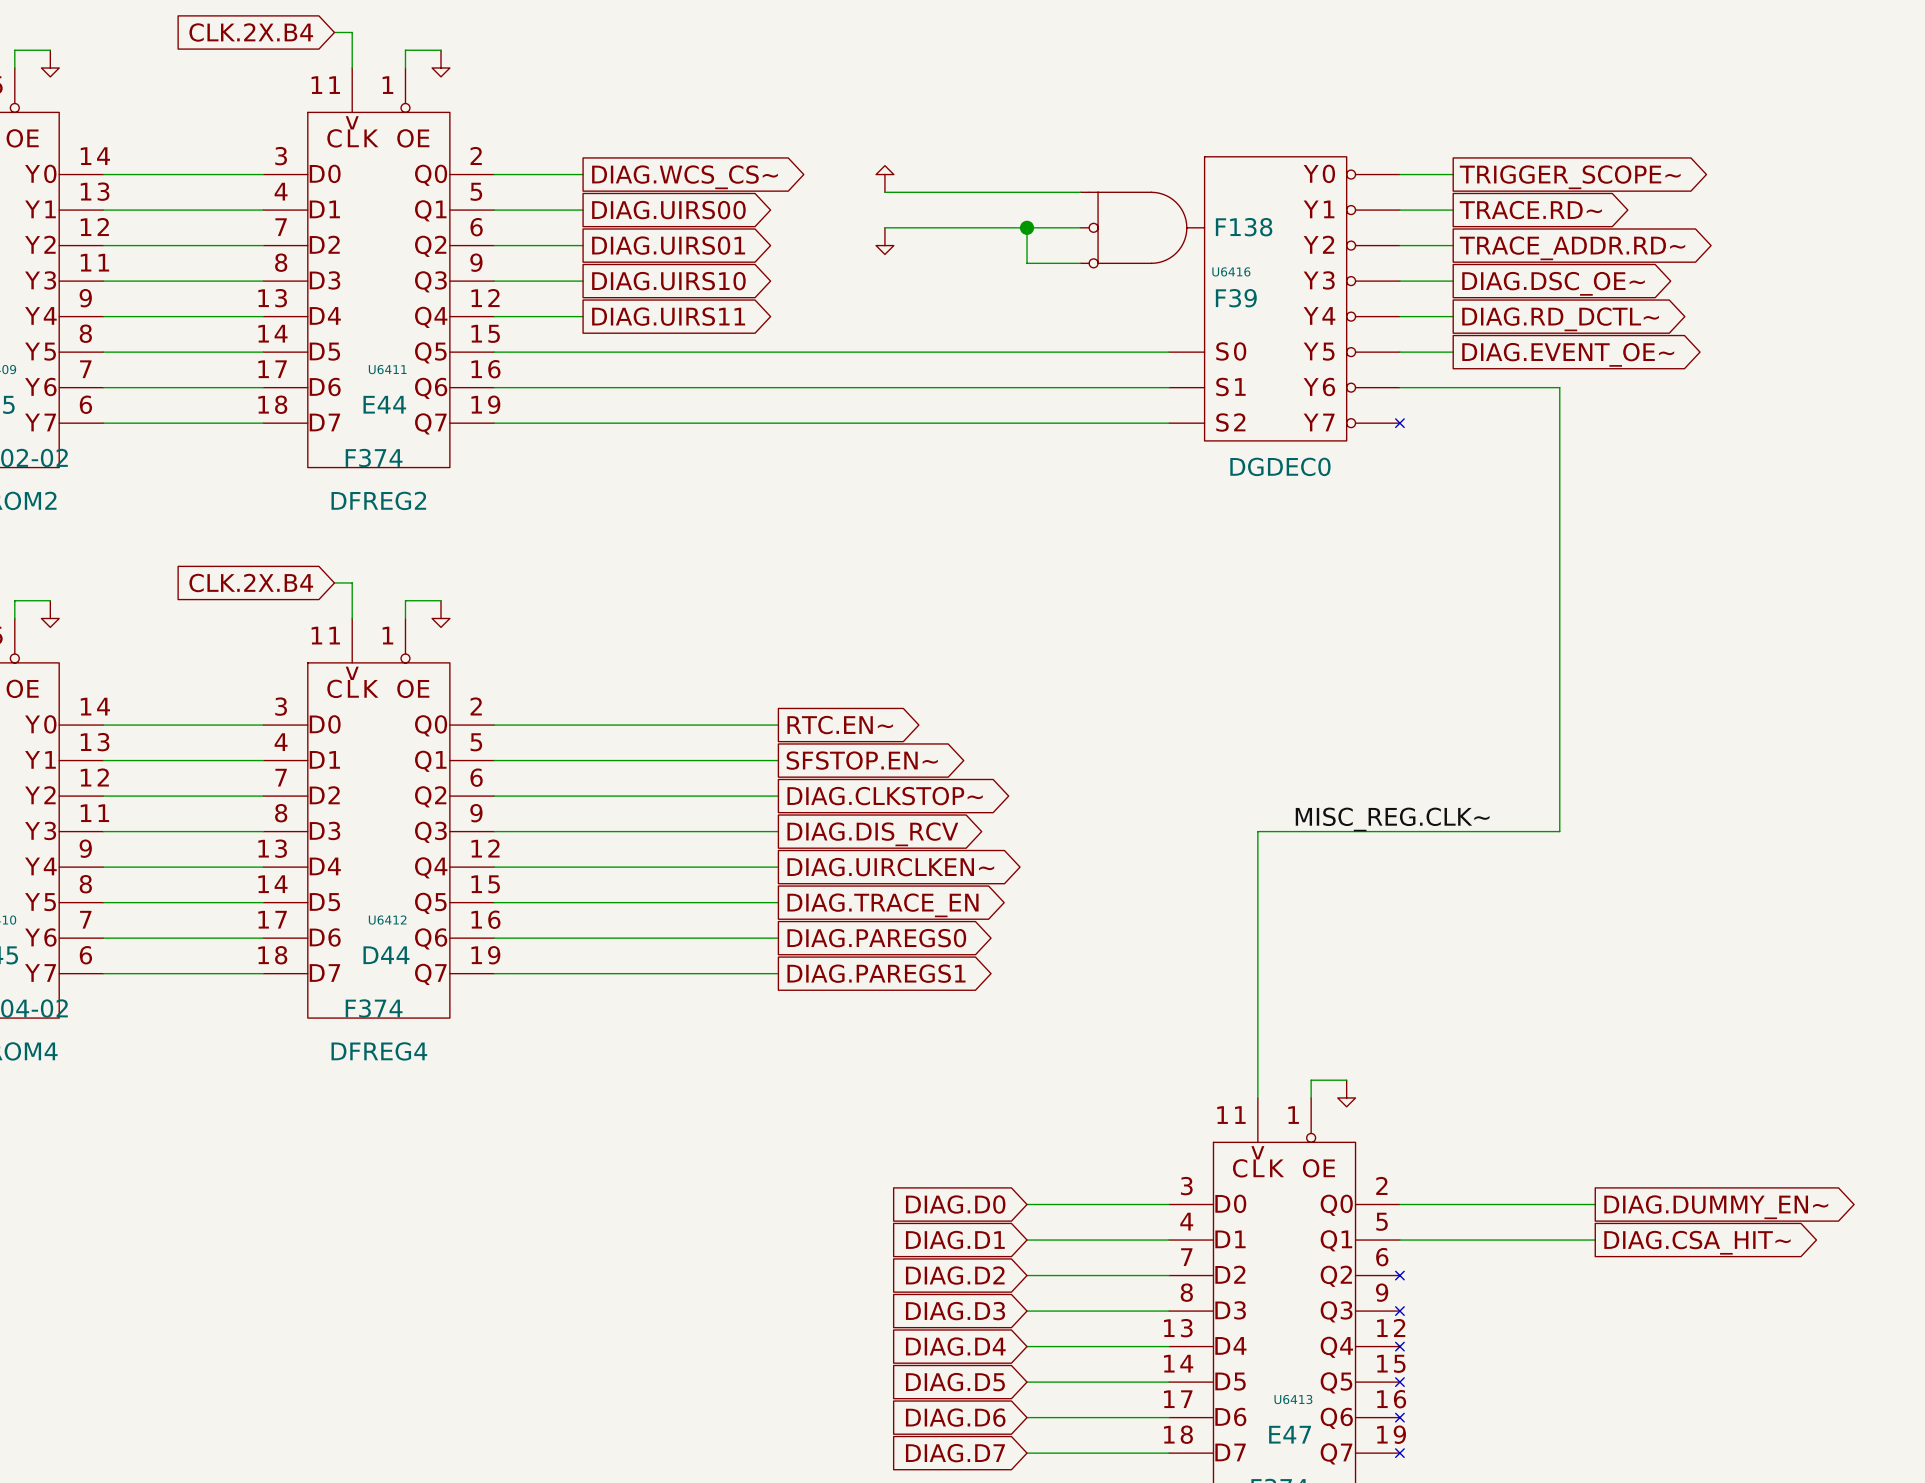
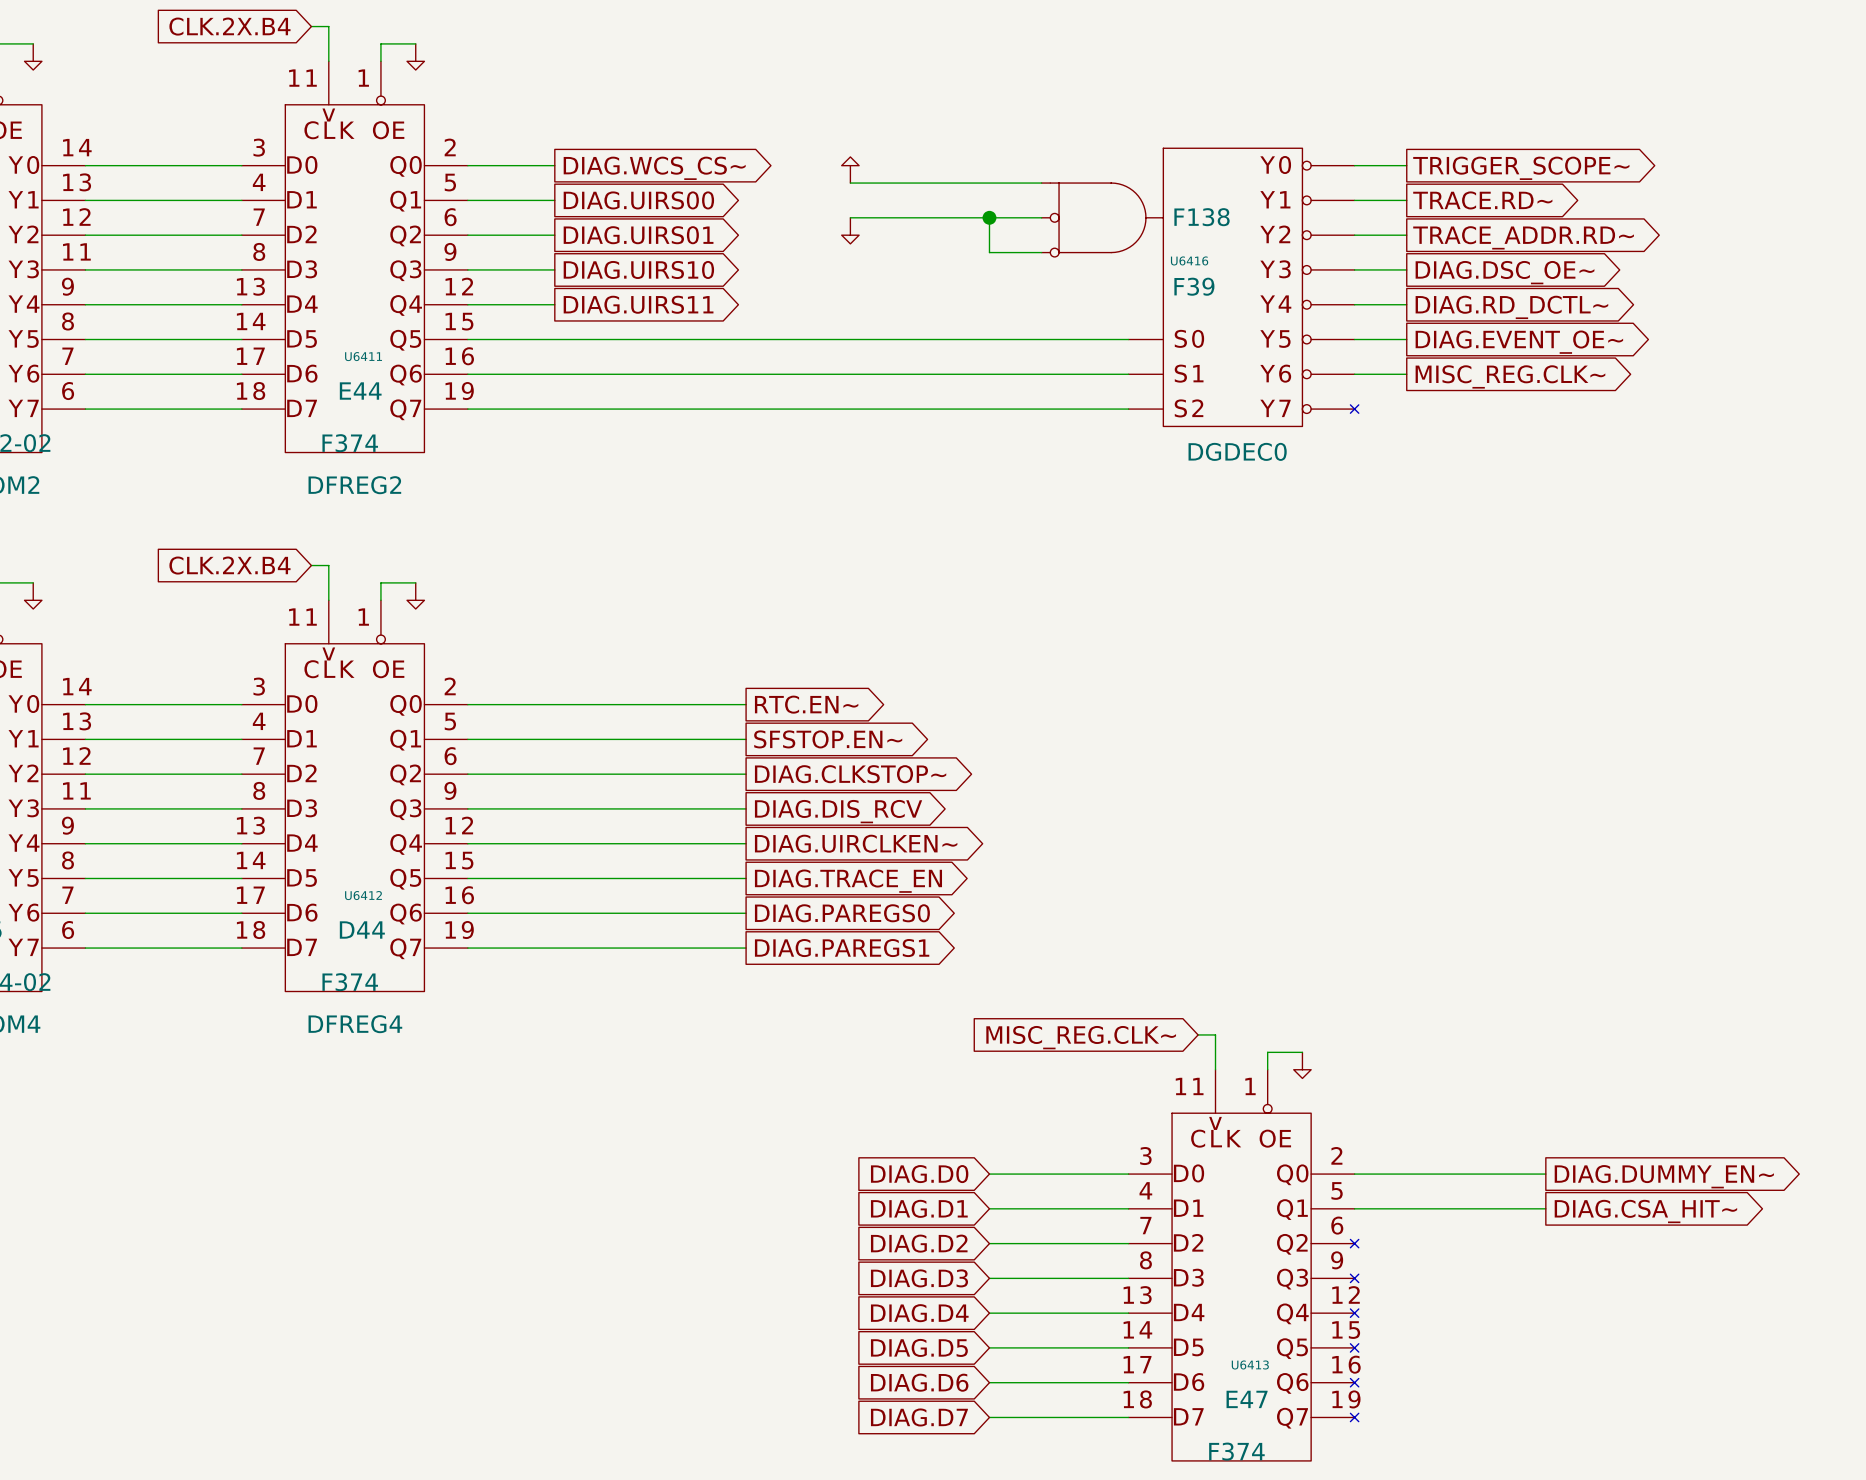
wire: (1453, 387) (1559, 387) (1559, 831) (1257, 831) (1257, 1062) -> (1198, 1034) (1215, 1034)
global label: none -> MISC_REG.CLK~ (1510, 376)
label: MISC_REG.CLK~ (1392, 819) -> none
global label: none -> MISC_REG.CLK~ (1081, 1037)

